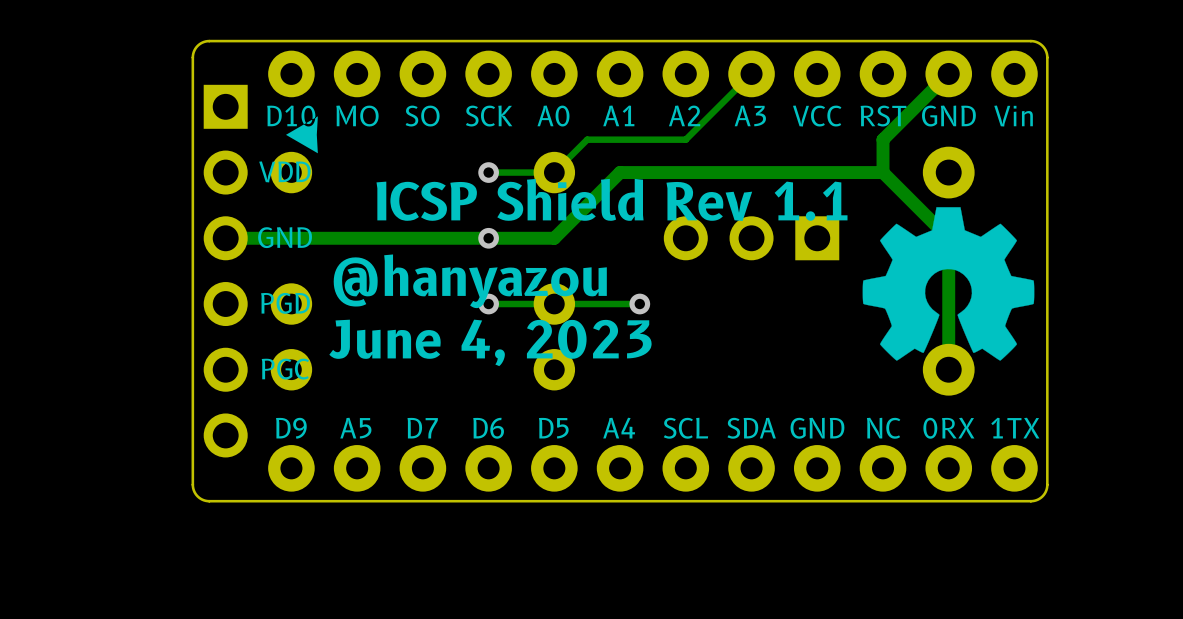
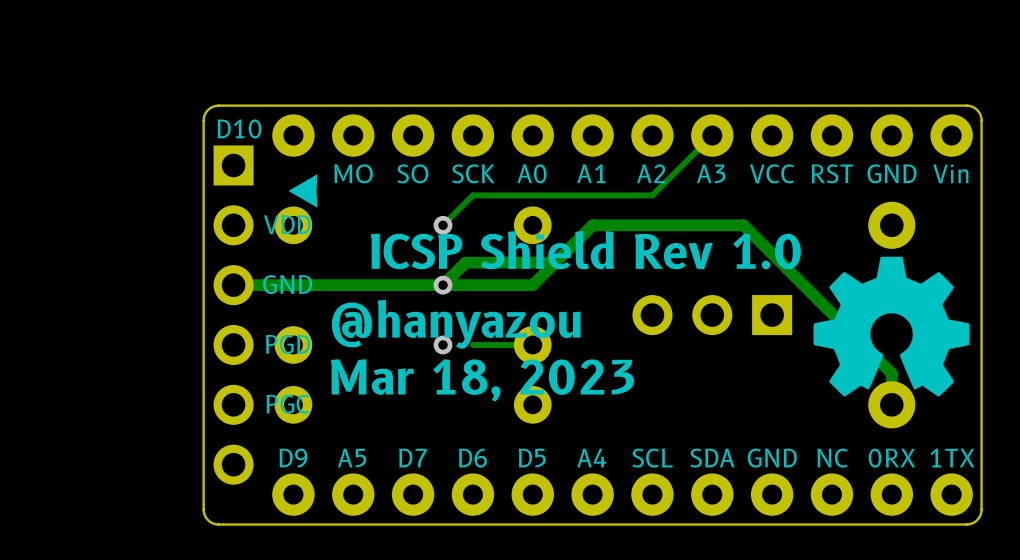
track: (948, 73) (883, 139) (883, 172) -> none
part text position: D10 (291, 116) -> D10 (239, 128)
track: (587, 139) (554, 172) (488, 172) -> (562, 195) (472, 195) (443, 225)
via position: (488, 172) -> (443, 225)
track: (883, 172) (948, 238) (948, 335) -> (743, 225) (891, 373)
track: (883, 172) (785, 172) -> none
text: ICSP Shield Rev 1.1 (612, 199) -> ICSP Shield Rev 1.0 (585, 250)
track: none -> (555, 262) (465, 262) (443, 285)
via position: (488, 238) -> (443, 285)
part position: (751, 238) -> (712, 315)
via position: (488, 304) -> (443, 344)
track: (639, 304) (570, 304) -> none
via: (639, 304) -> none
text: June 4, 2023 (490, 342) -> Mar 18, 2023 (482, 380)

